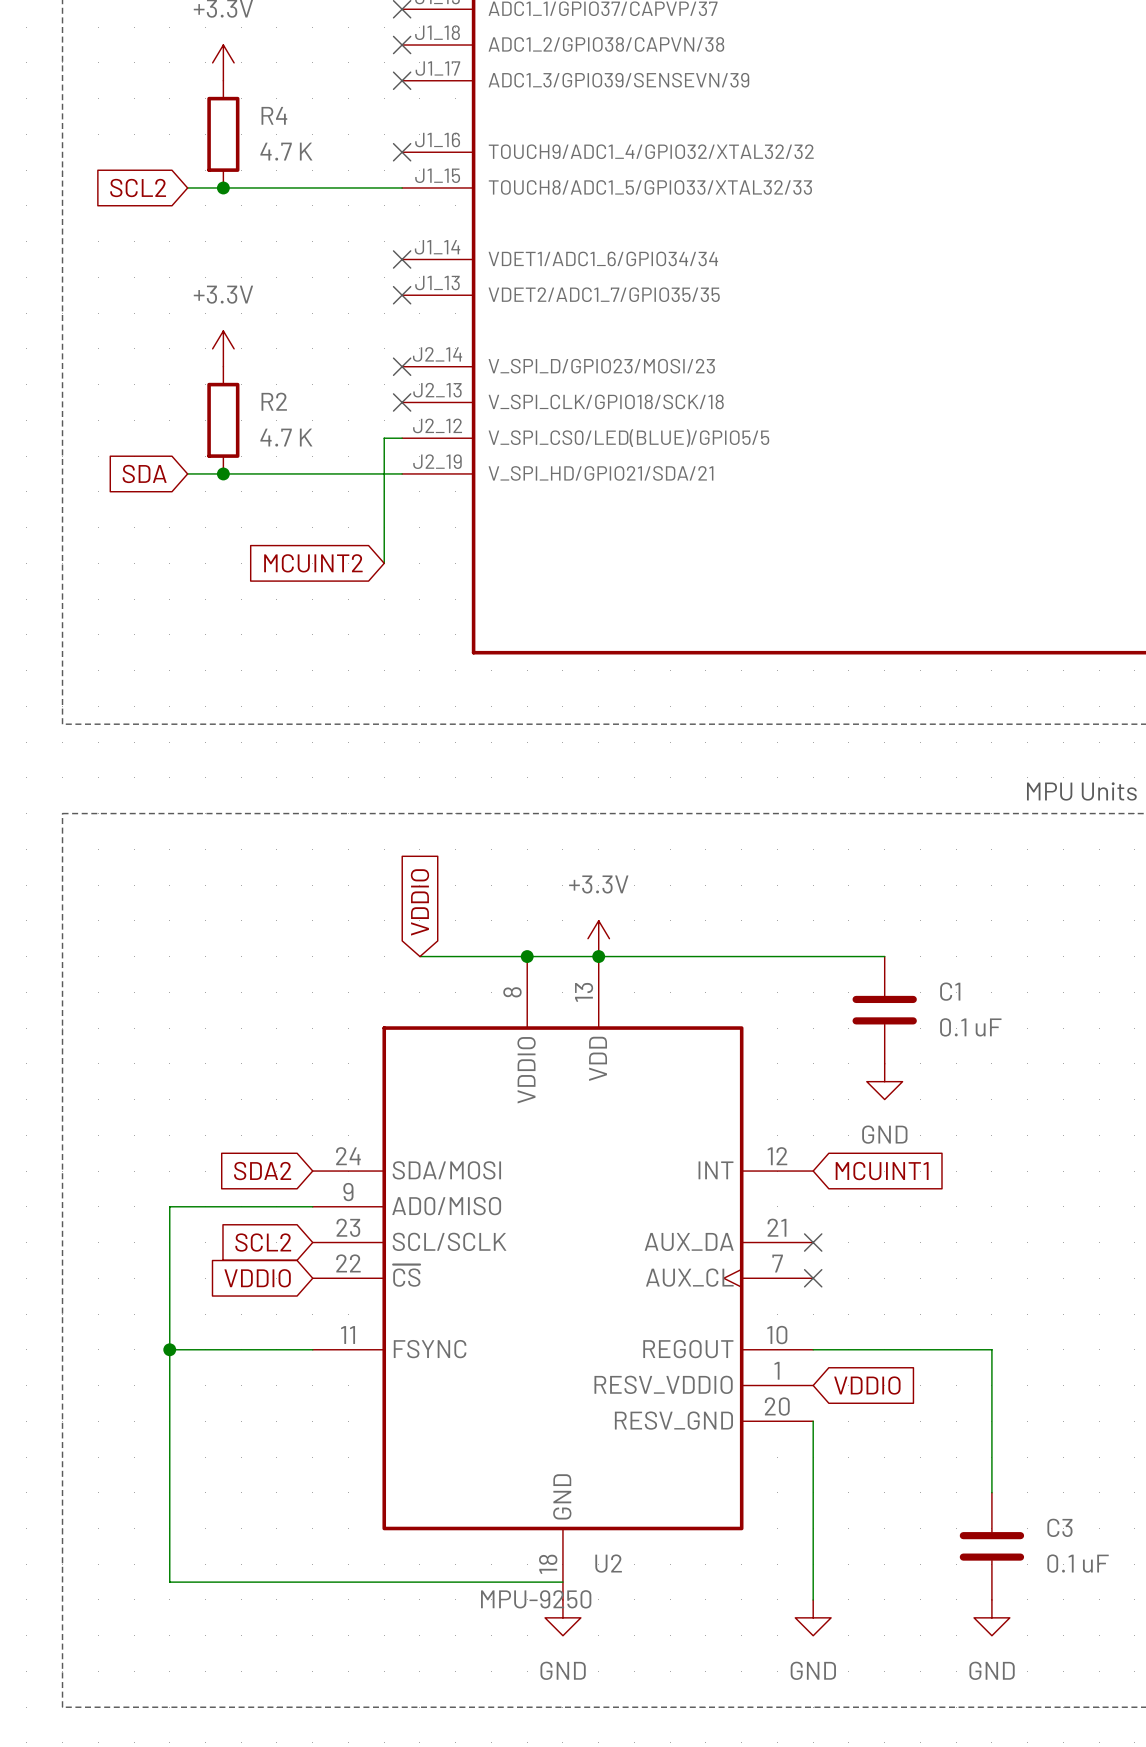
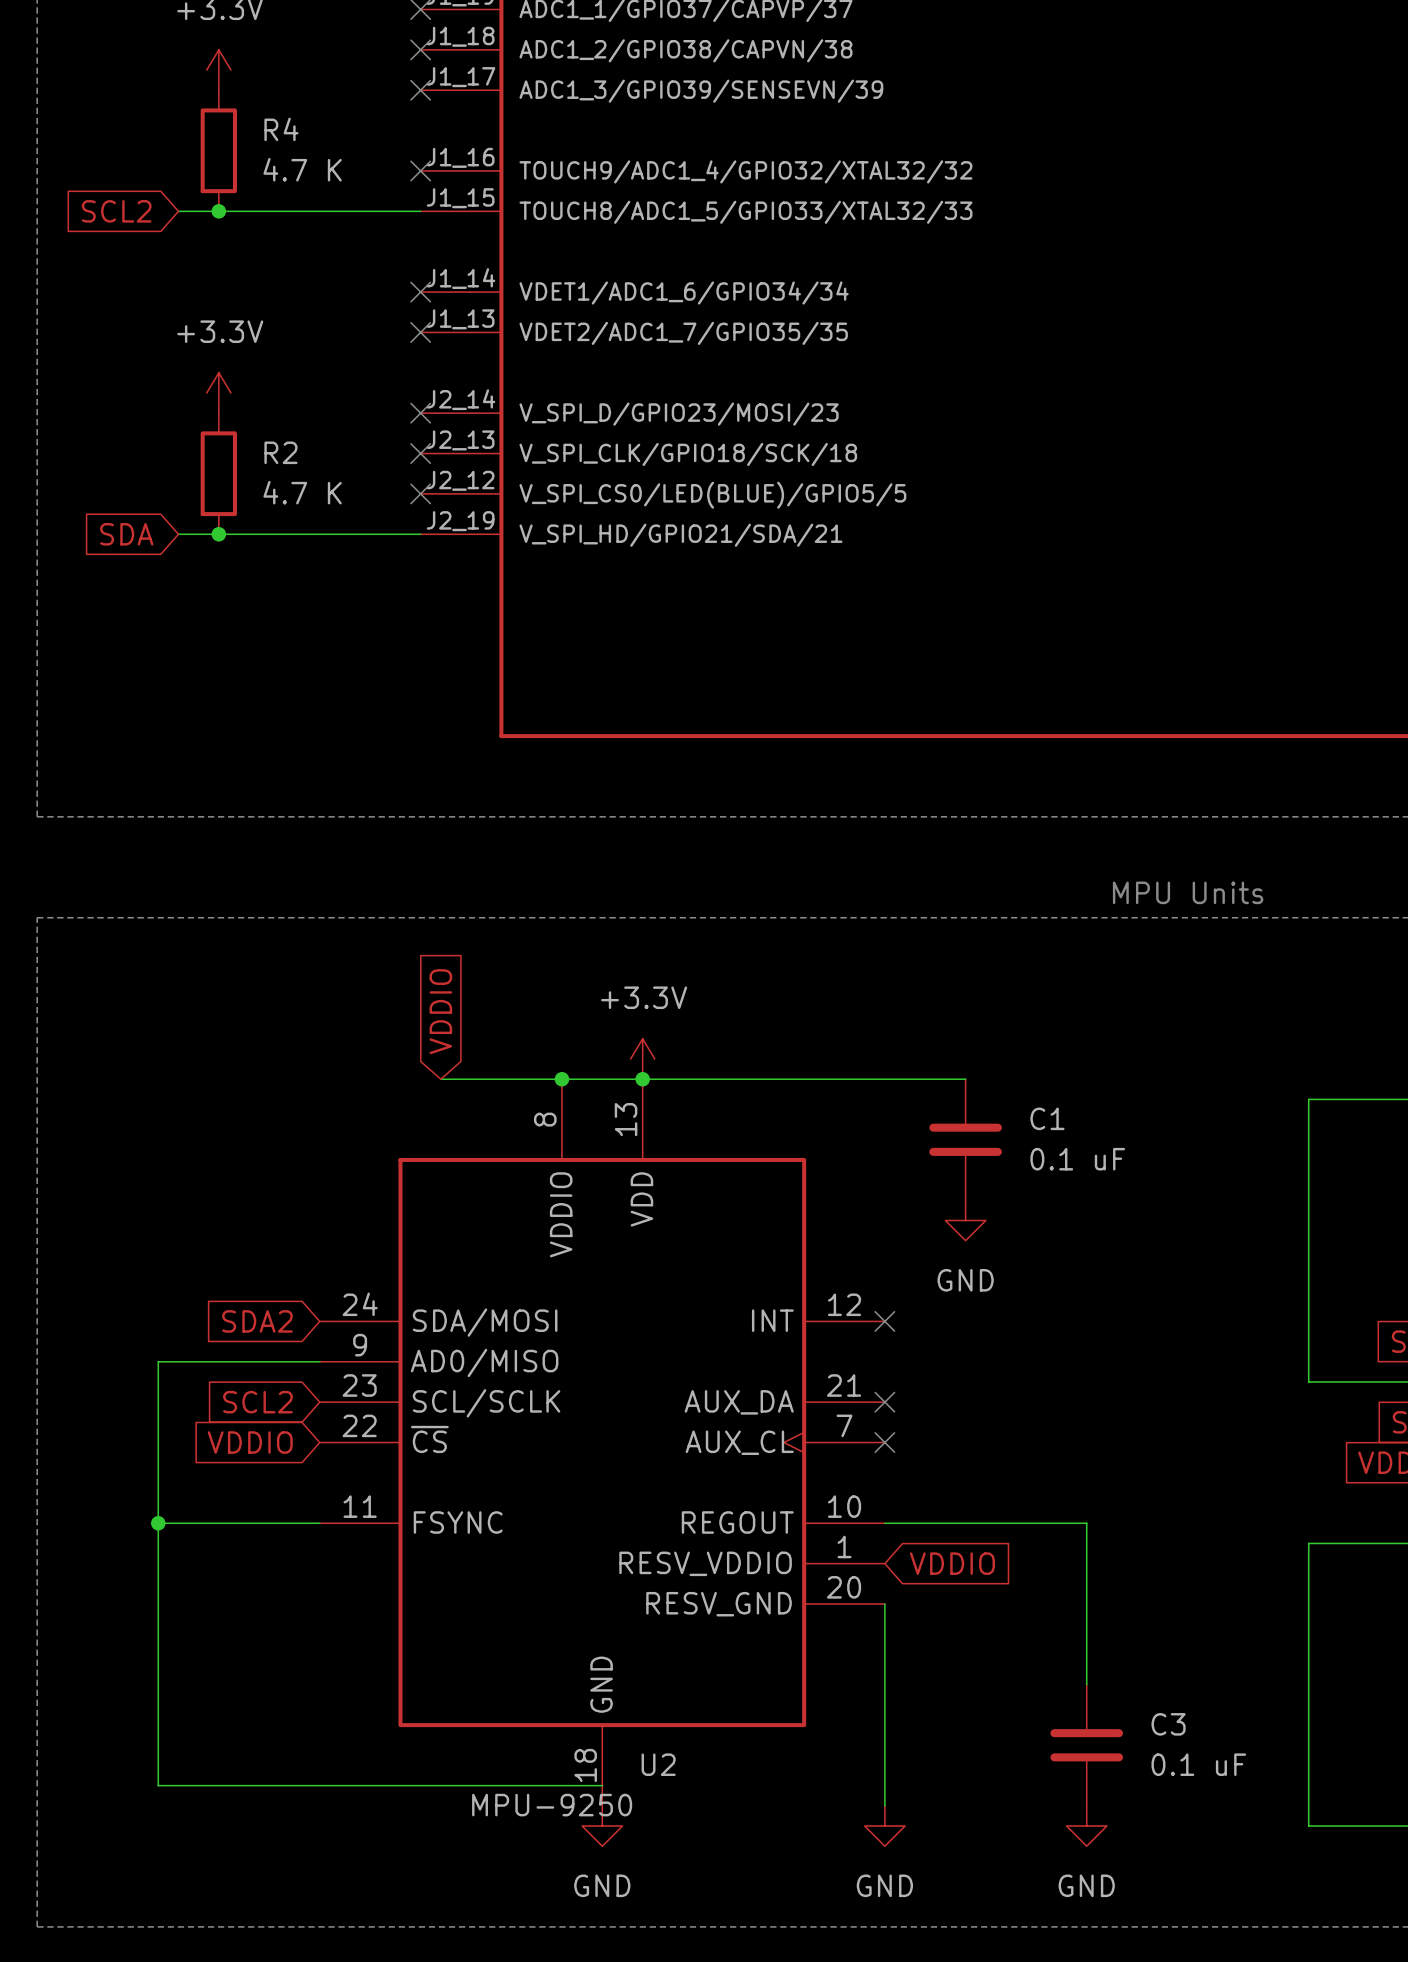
wire: (402, 438) (384, 438) (384, 563) -> none
no-connect mark: none -> (420, 493)
global label: MCUINT2 (313, 563) -> none
no-connect mark: none -> (884, 1321)
global label: MCUINT1 (882, 1171) -> none

